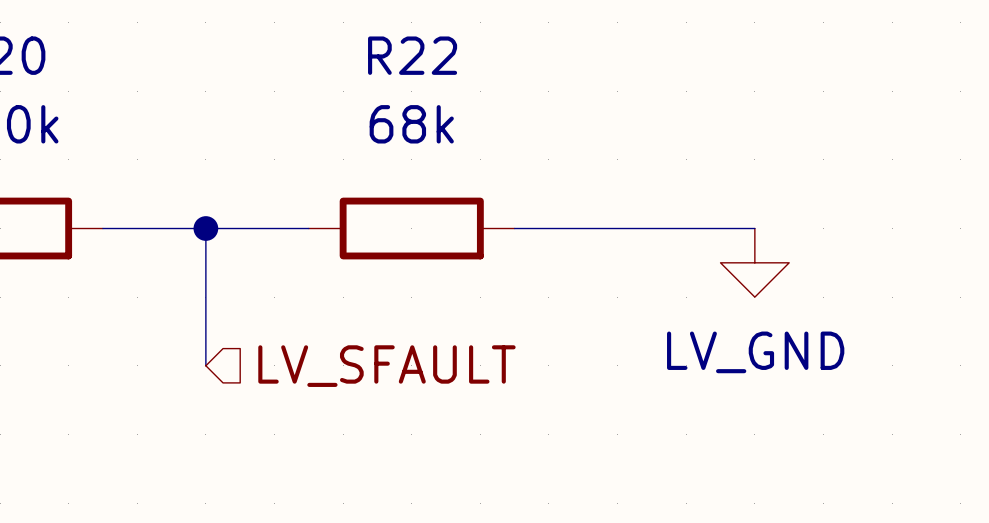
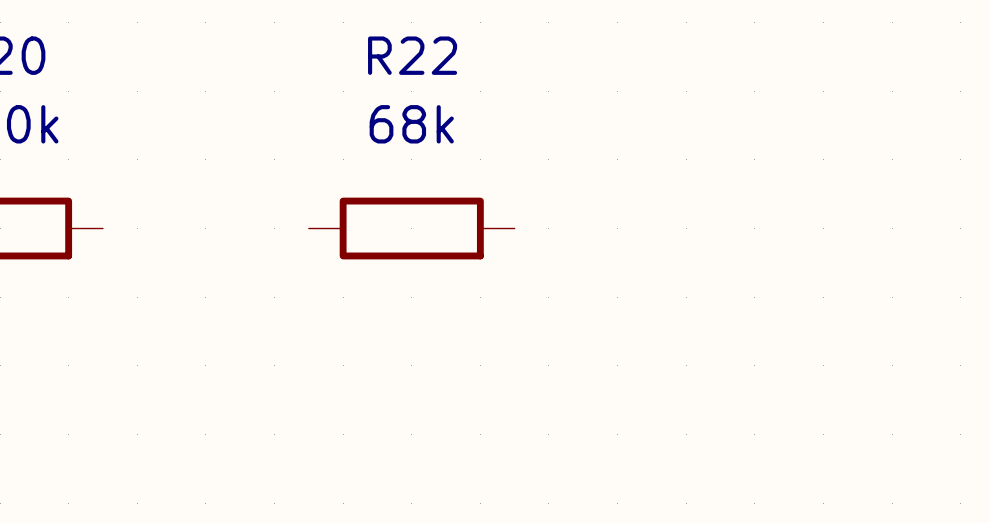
wire: (102, 228) (308, 228) -> none
wire: (205, 228) (205, 365) -> none
junction: (205, 228) -> none
wire: (514, 228) (754, 228) -> none
power symbol: LV_GND (754, 262) -> none
hierarchical label: LV_SFAULT (386, 366) -> none

